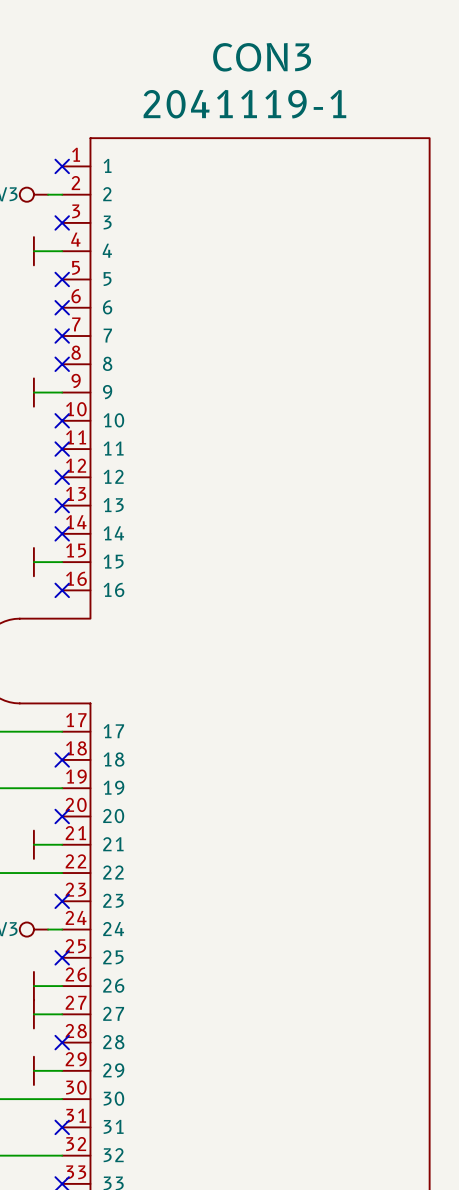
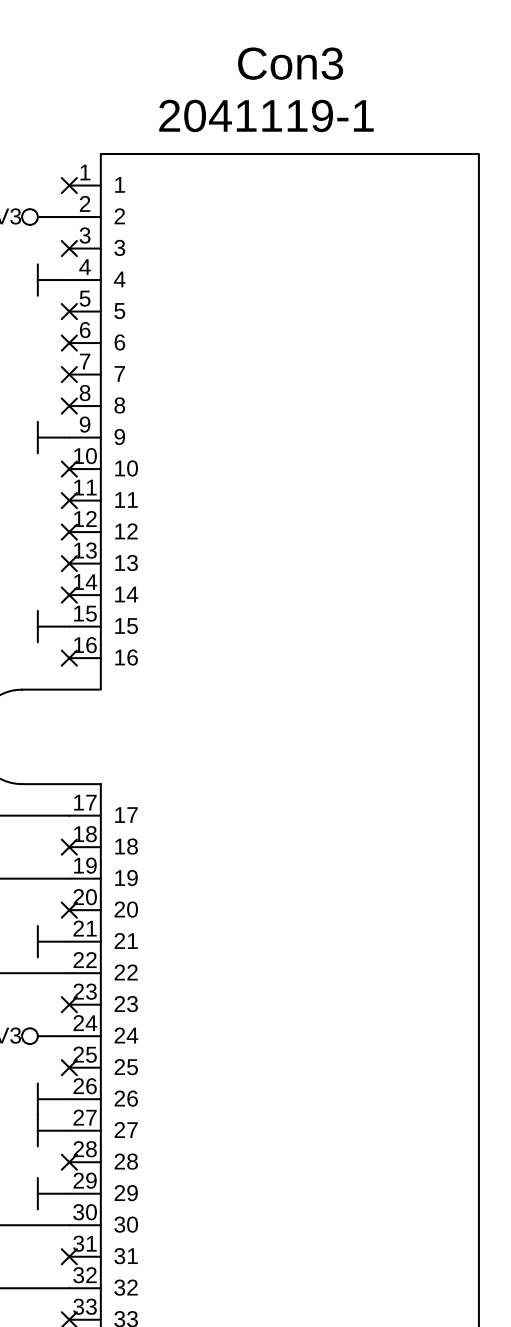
CON3 name: CON3 (262, 57) -> Con3 (290, 63)

